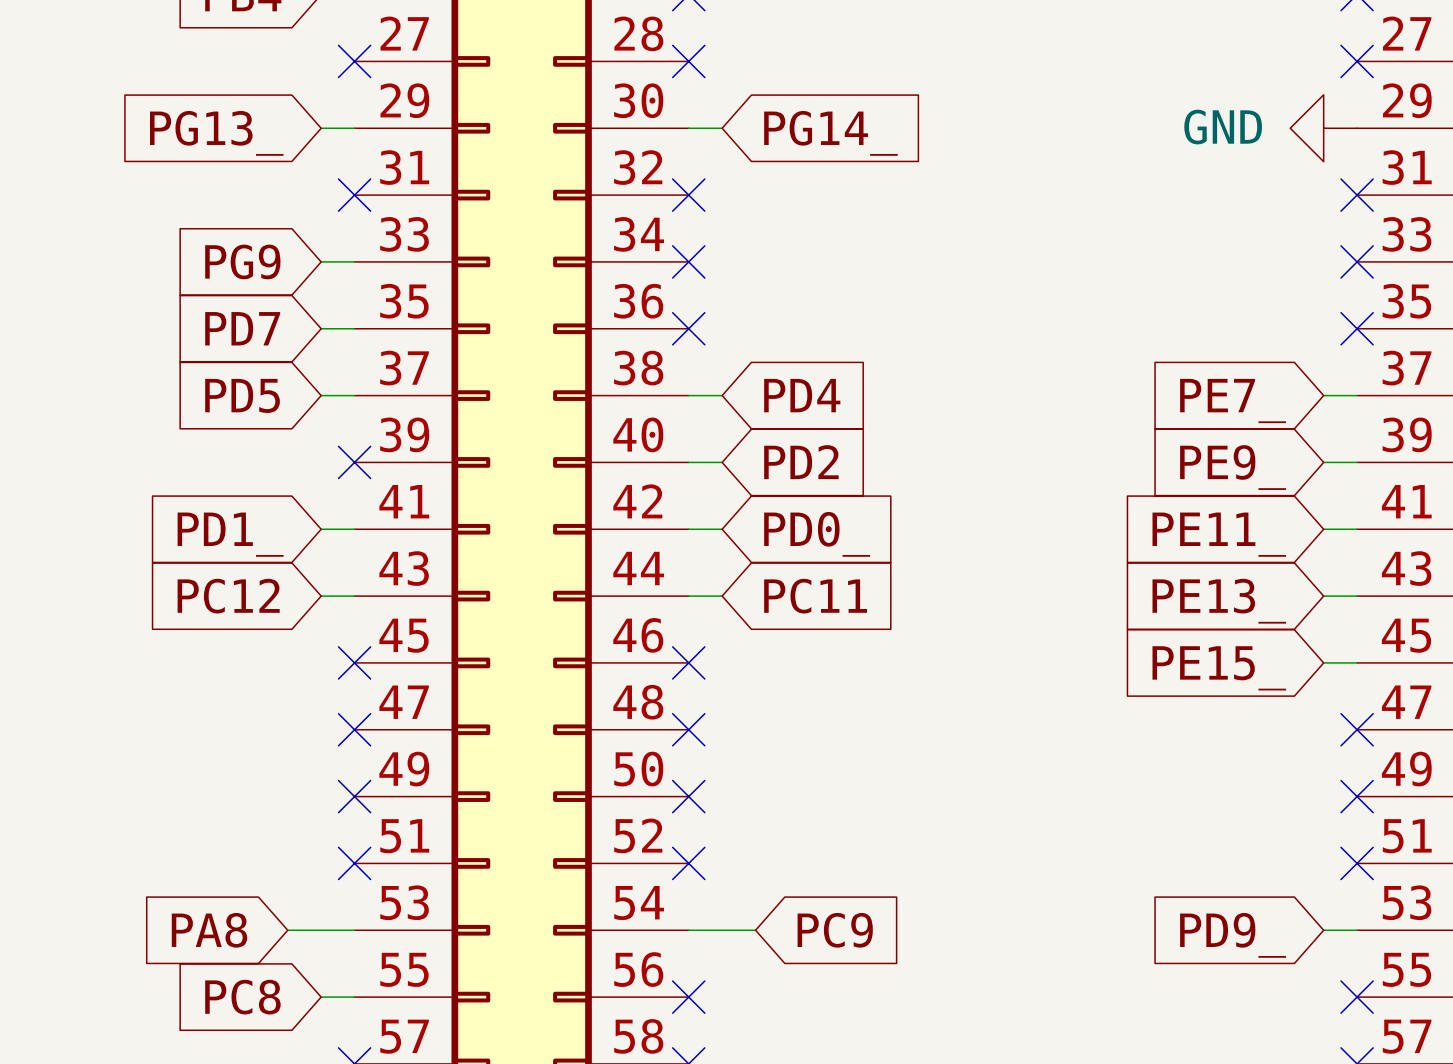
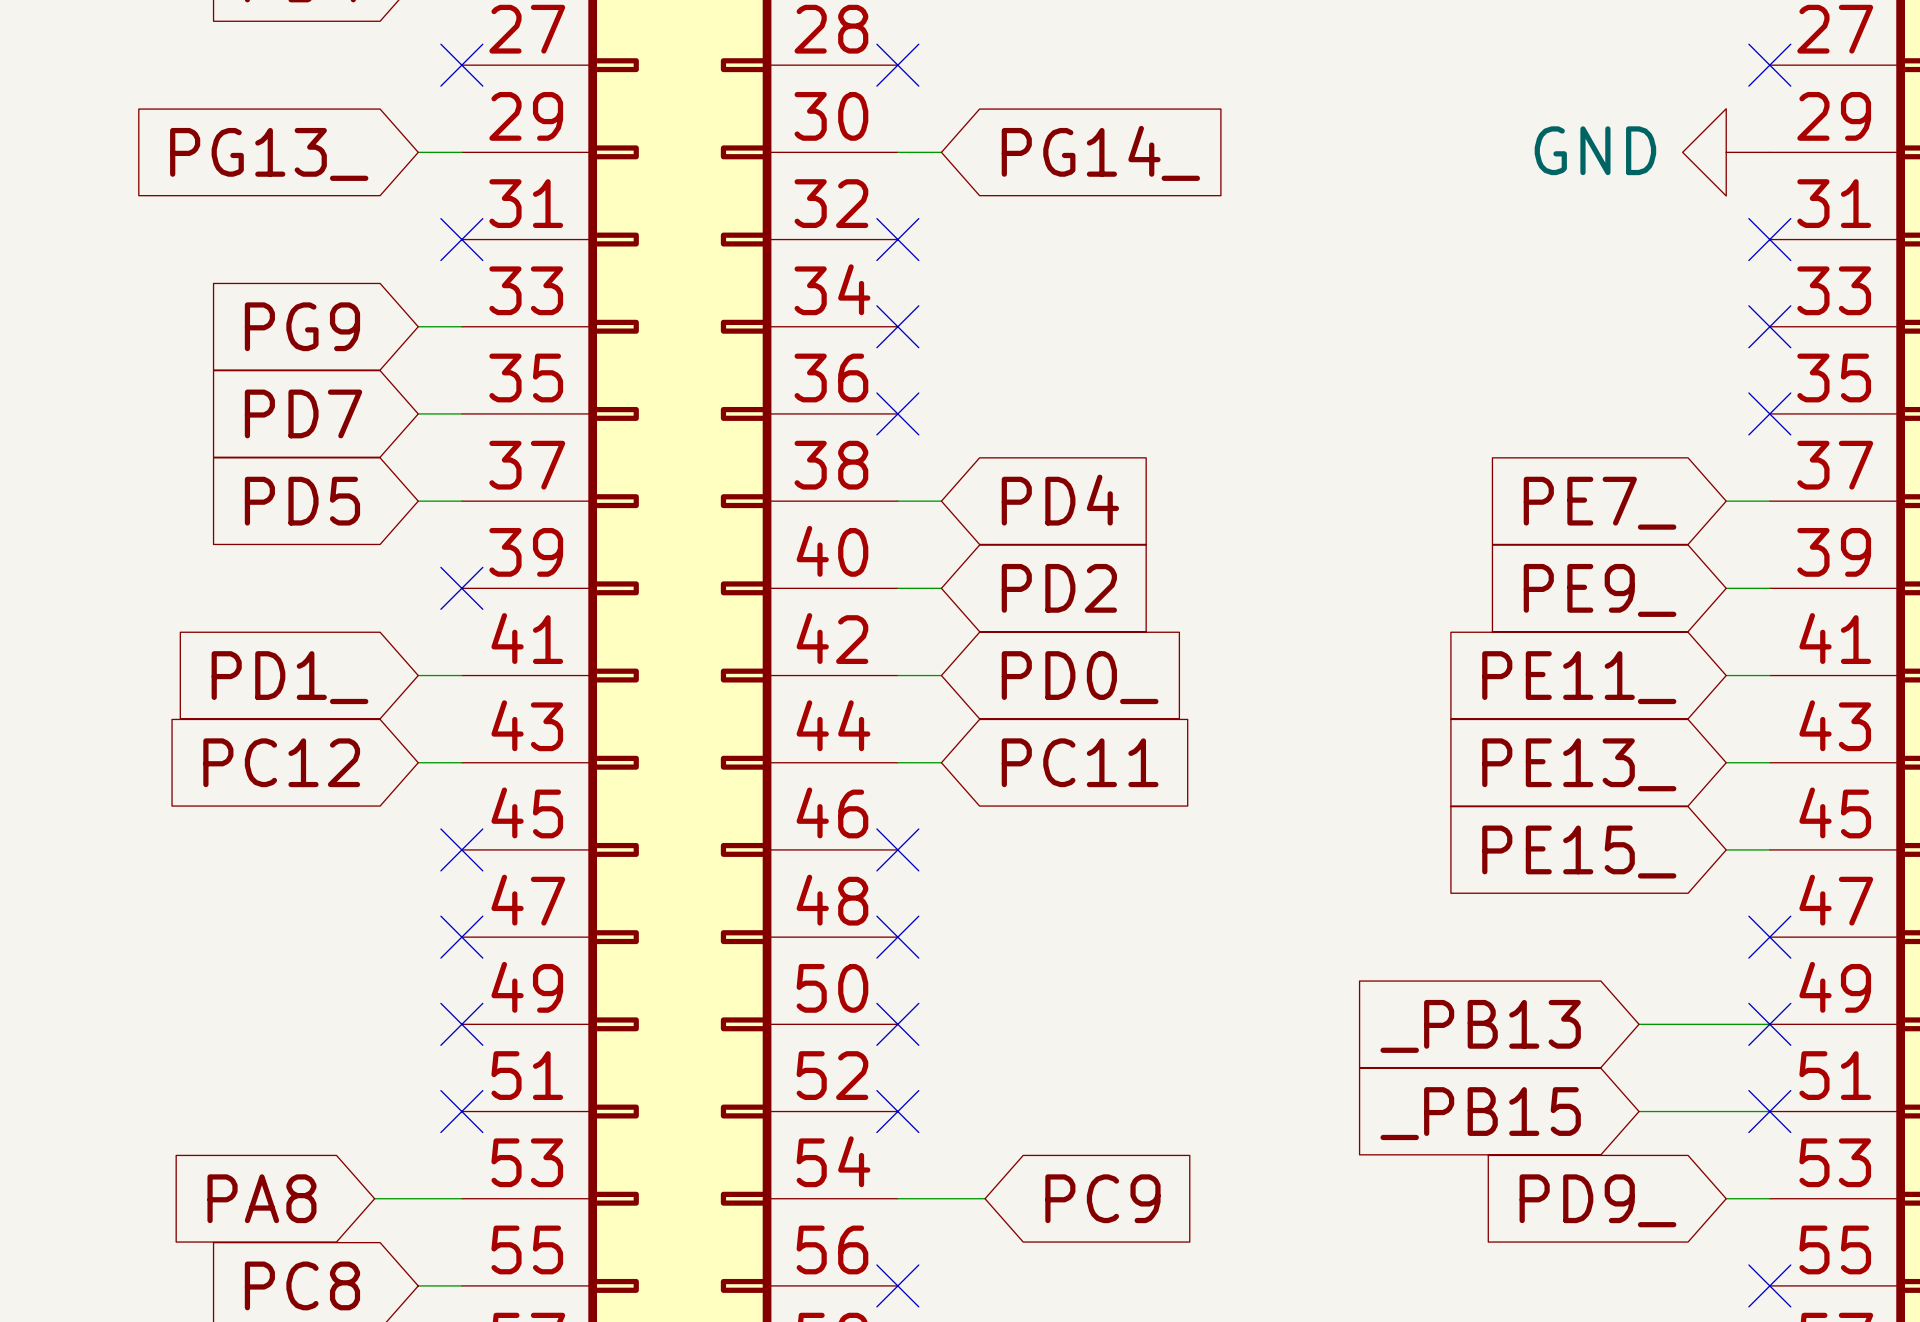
wire: none -> (1639, 1024) (1769, 1024)
global label: none -> _PB13 (1480, 1026)
wire: none -> (1639, 1111) (1769, 1111)
global label: none -> _PB15 (1480, 1113)

